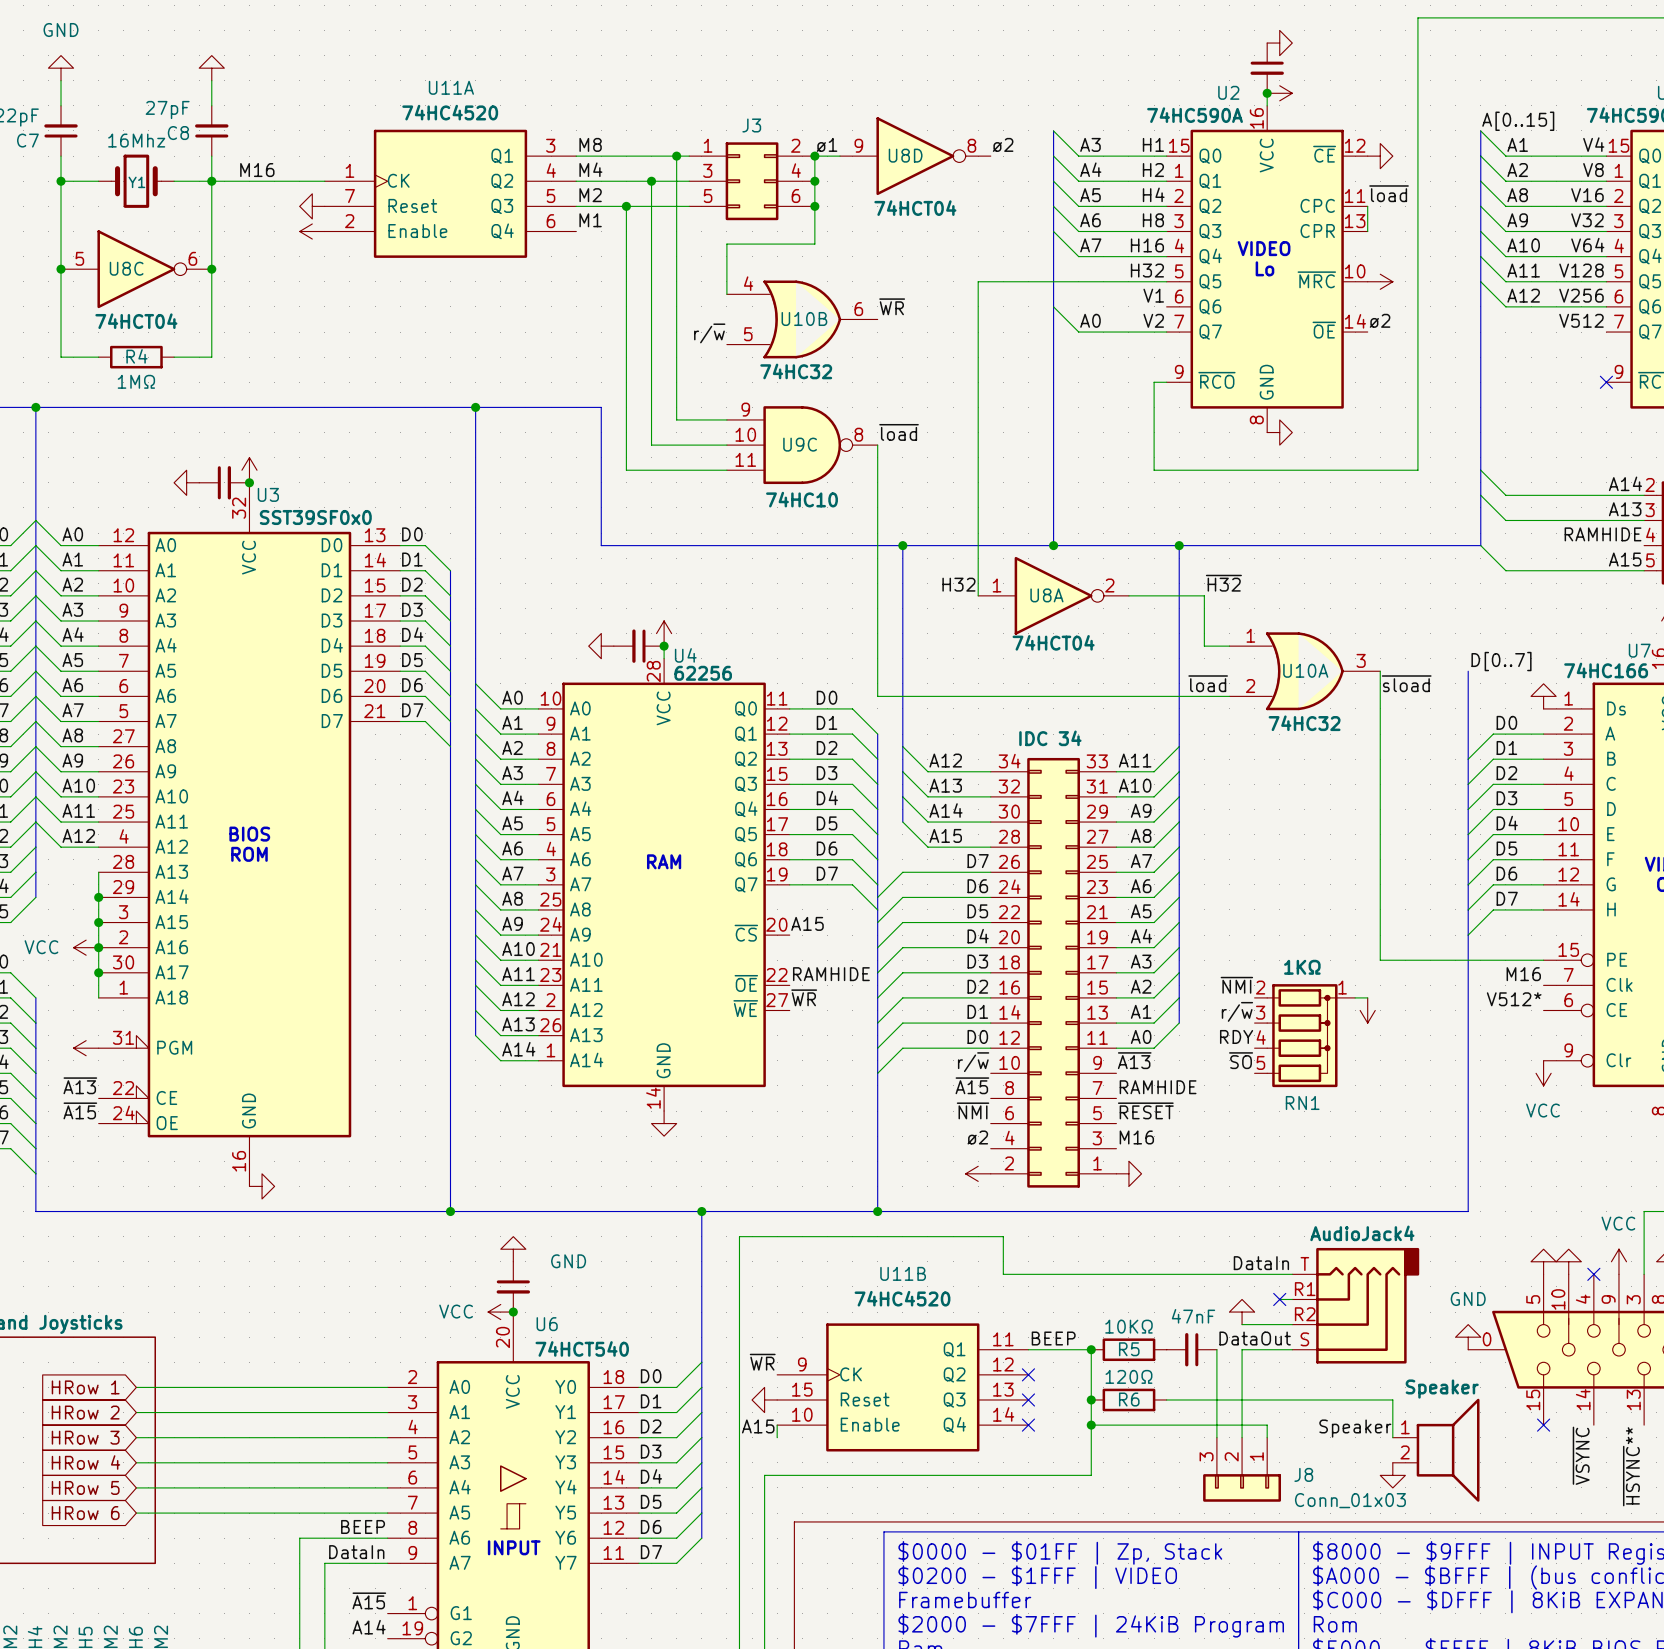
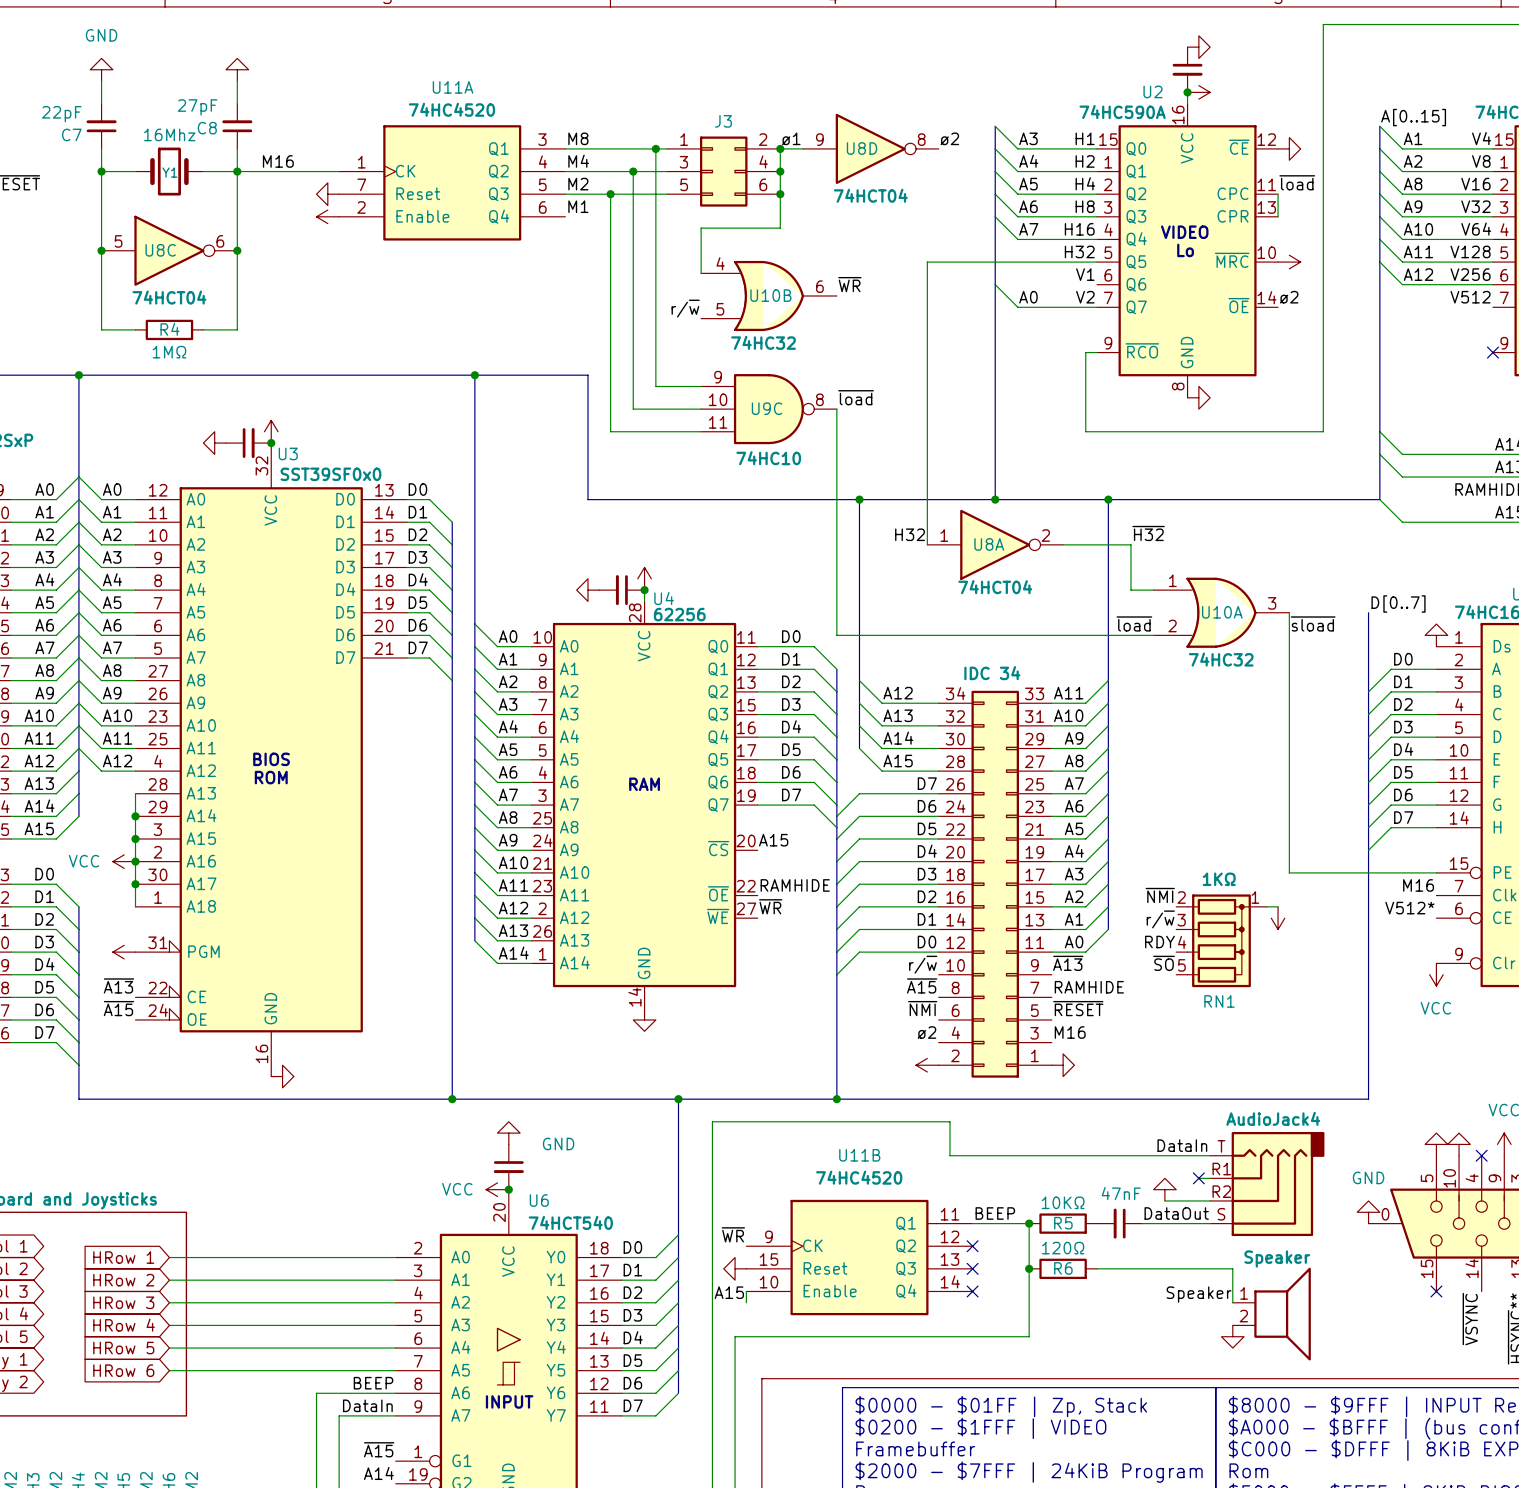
wire: (1216, 1349) (1216, 1437) -> (1142, 1223) (1164, 1223)
wire: (1242, 1349) (1242, 1437) -> none
wire: (1317, 1399) (1392, 1399) (1392, 1437) -> (1232, 1268) (1232, 1302)
wire: (1091, 1425) (1267, 1425) (1267, 1437) -> none
junction: (1091, 1425) -> none
label position: Speaker (1355, 1428) -> Speaker (1199, 1294)
part position: (1436, 1450) -> (1271, 1314)
J8: Conn_01x03 (1242, 1469) -> none
power symbol position: (1392, 1475) -> (1232, 1336)

